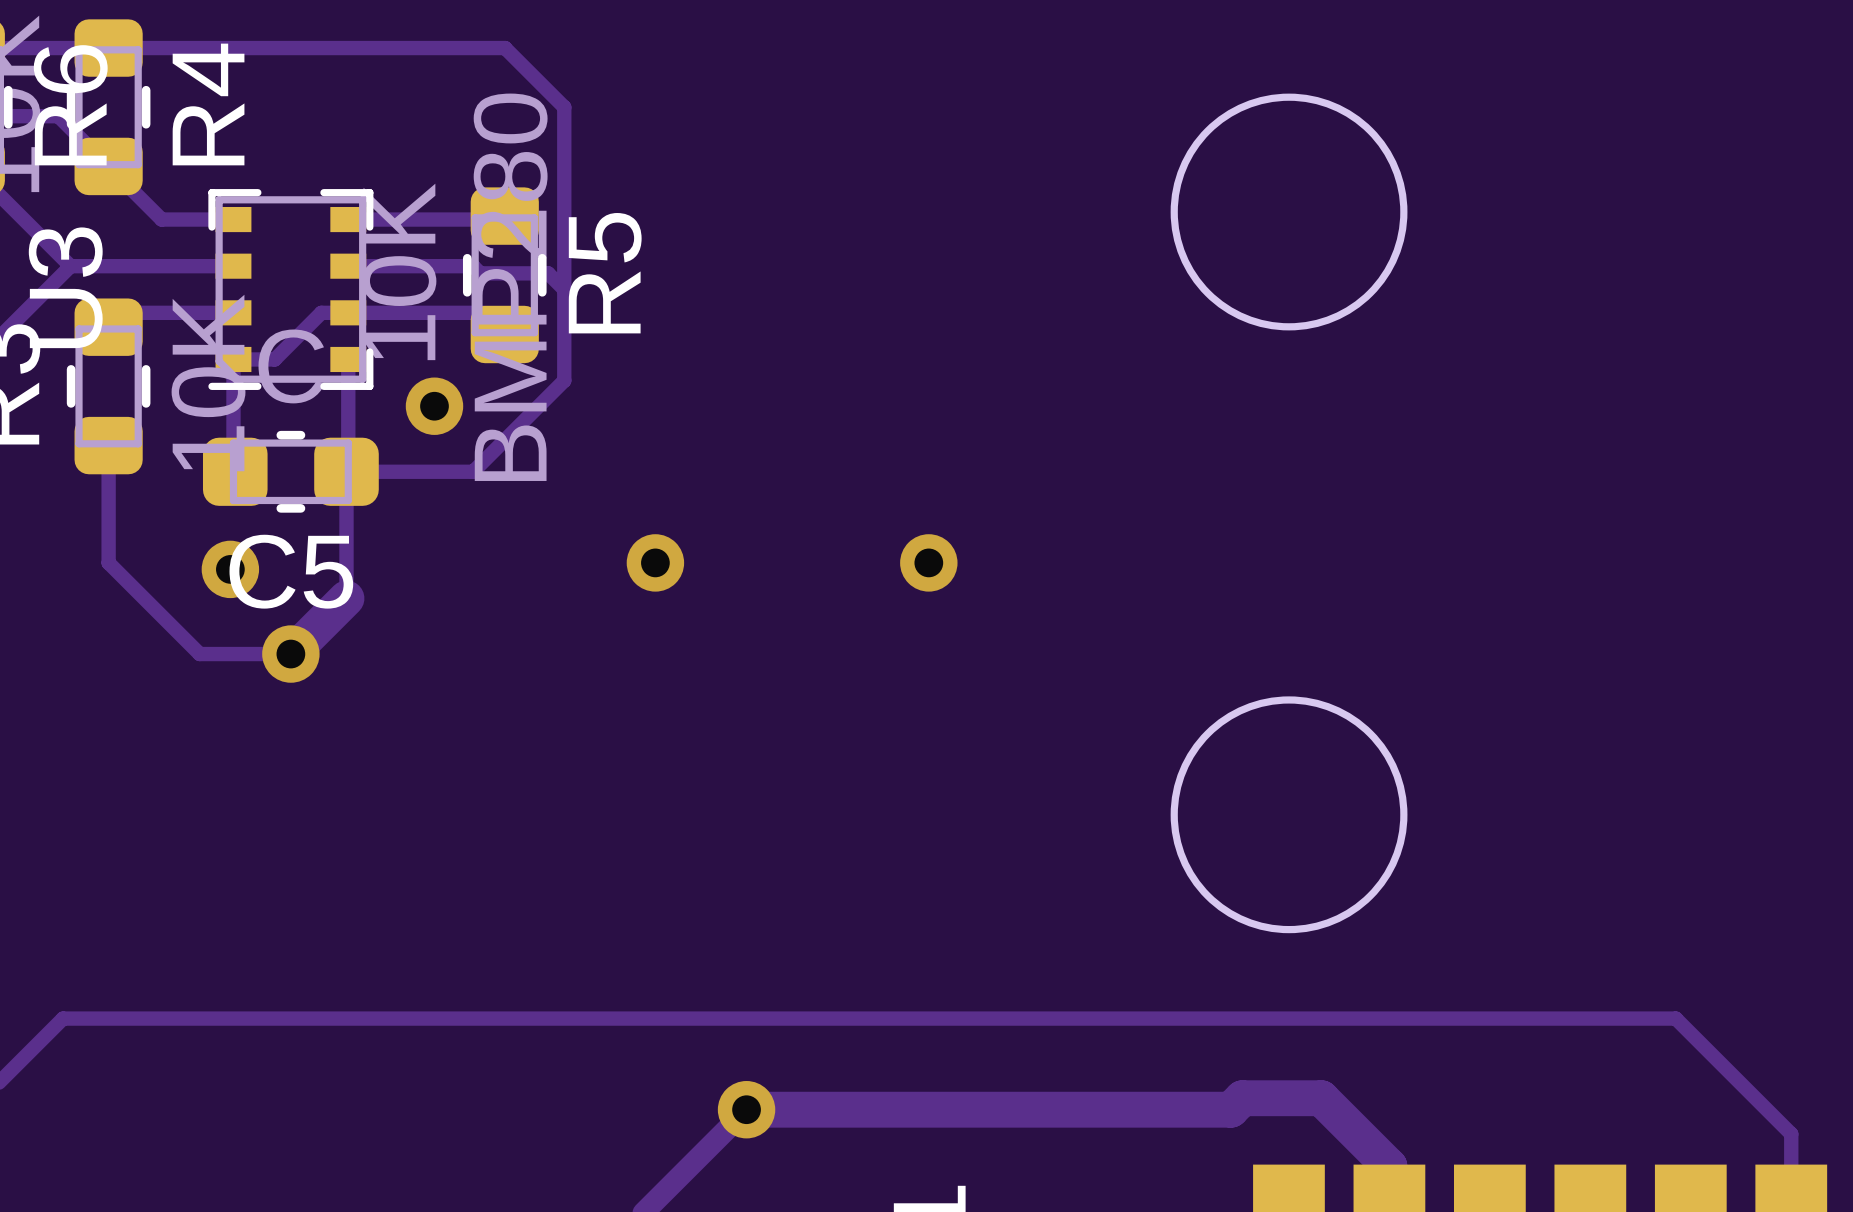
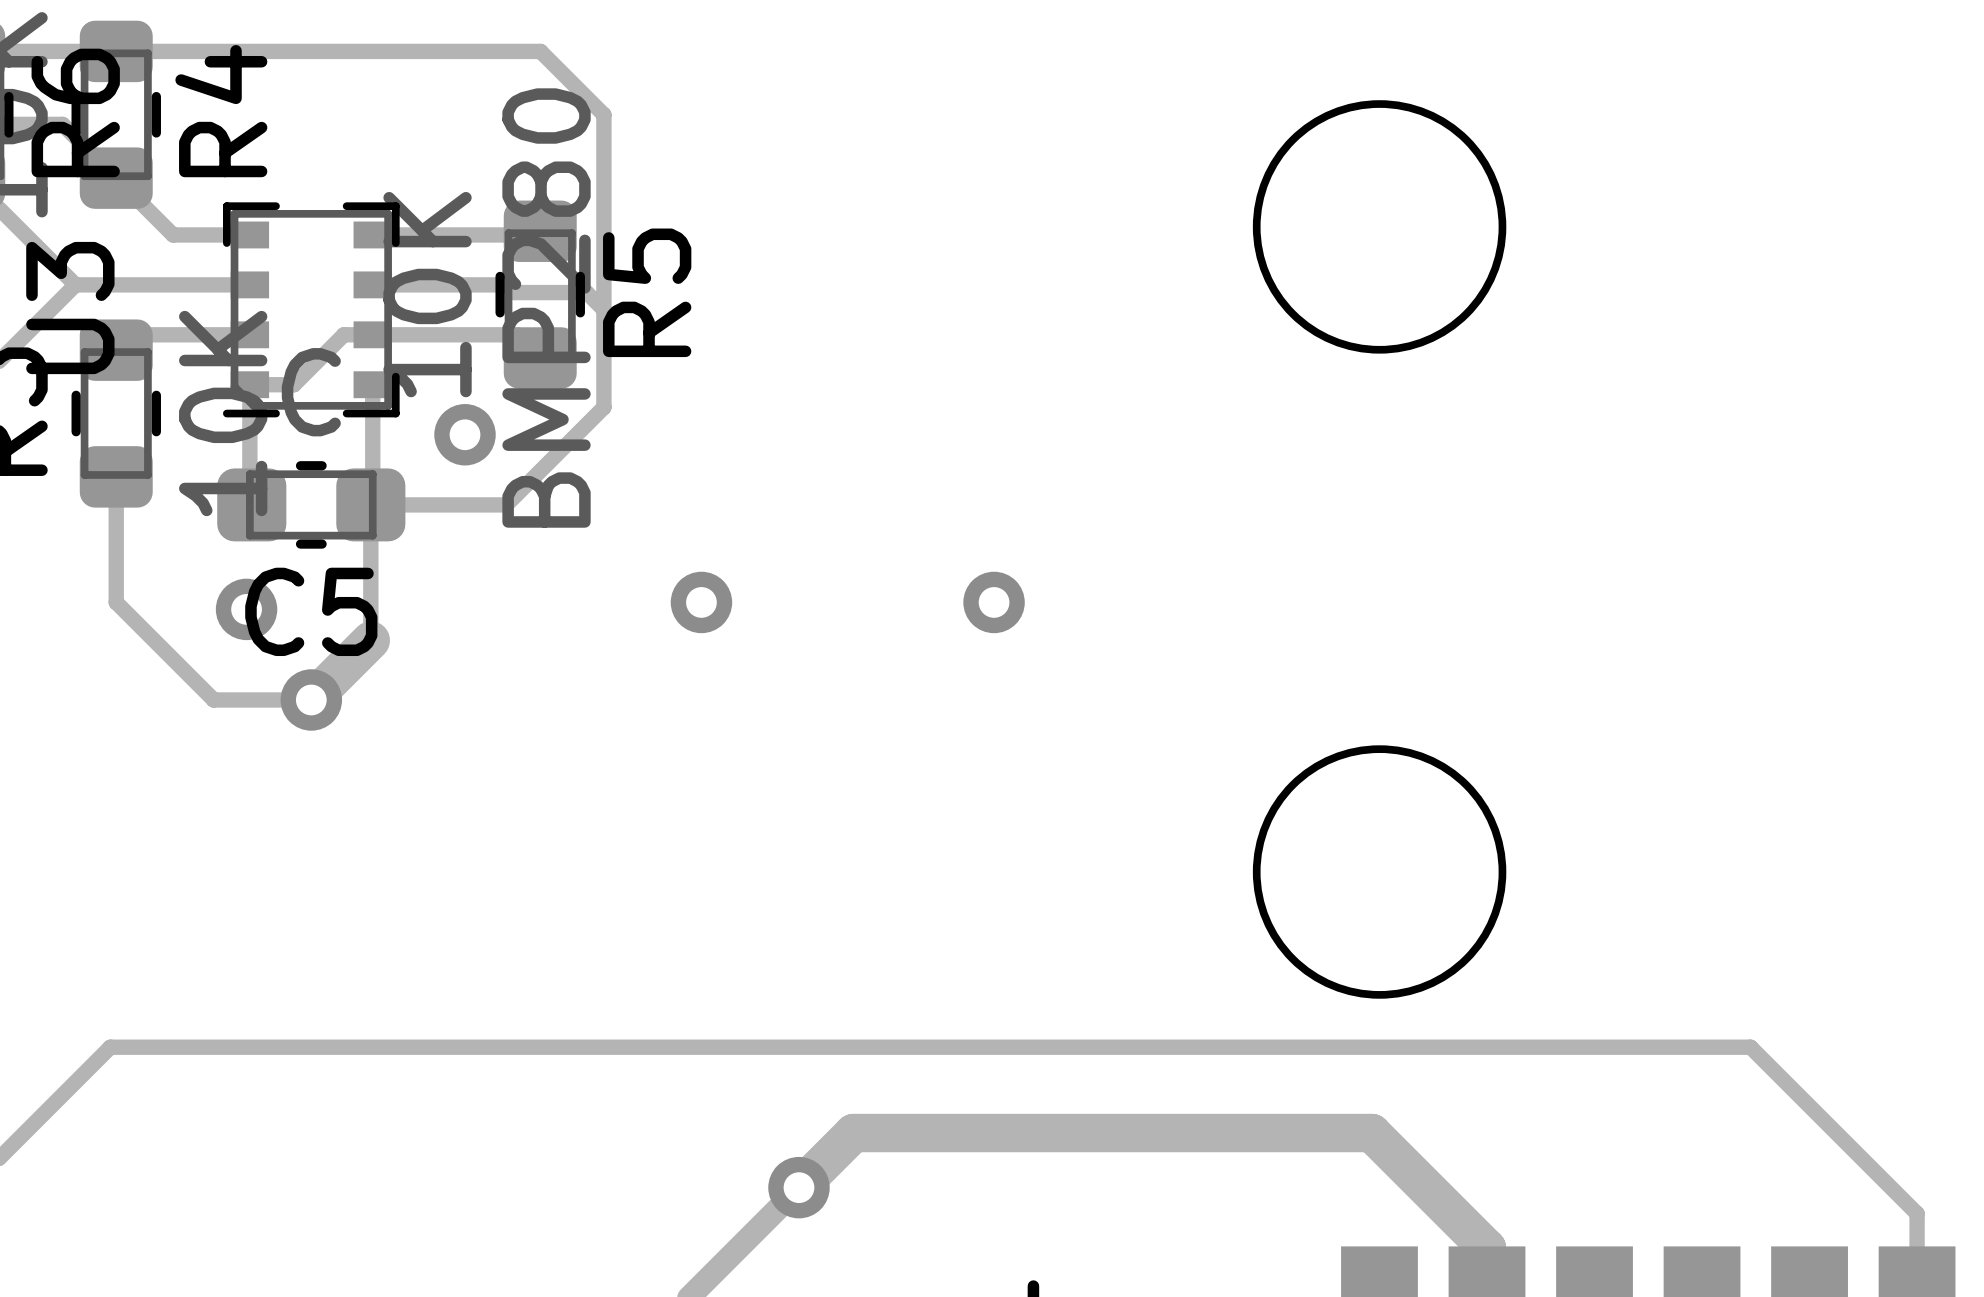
track: (63, 1018) (1675, 1018) -> (67, 1090) (110, 1047) (1750, 1047) (1793, 1090)
track: (1321, 1098) (1242, 1098) (1230, 1109) (746, 1109) -> (1414, 1175) (1371, 1133) (853, 1133) (798, 1187)

